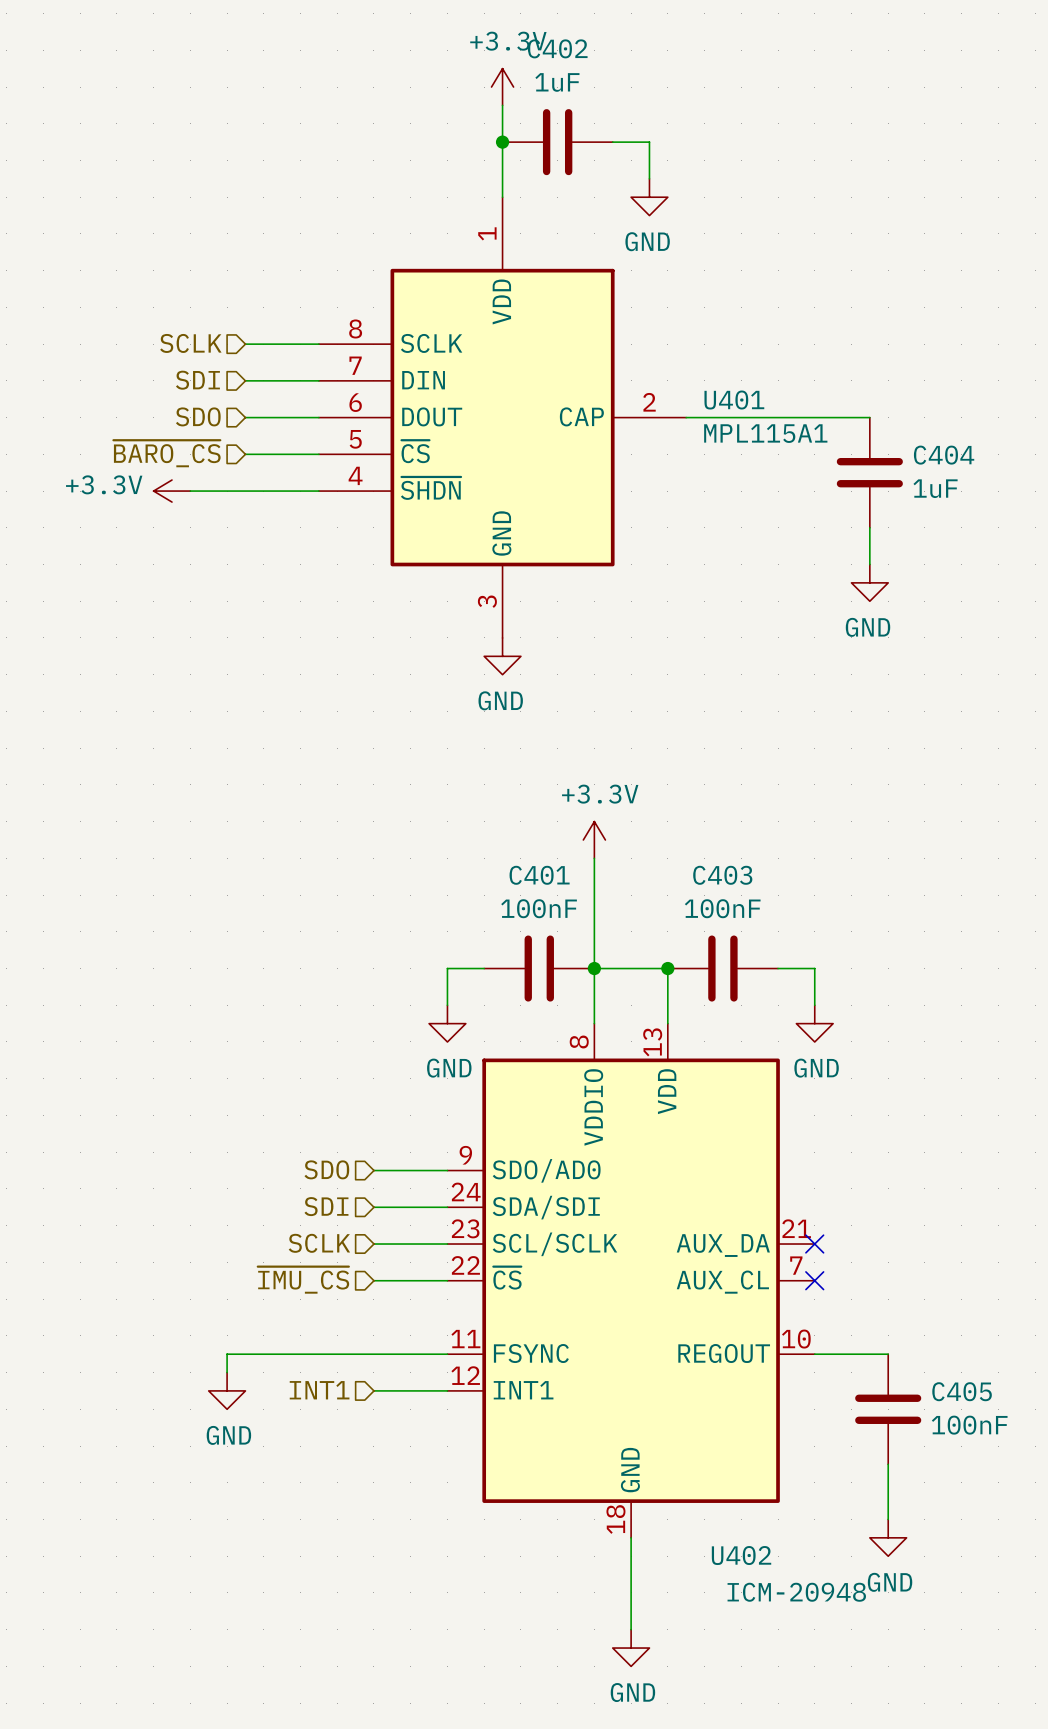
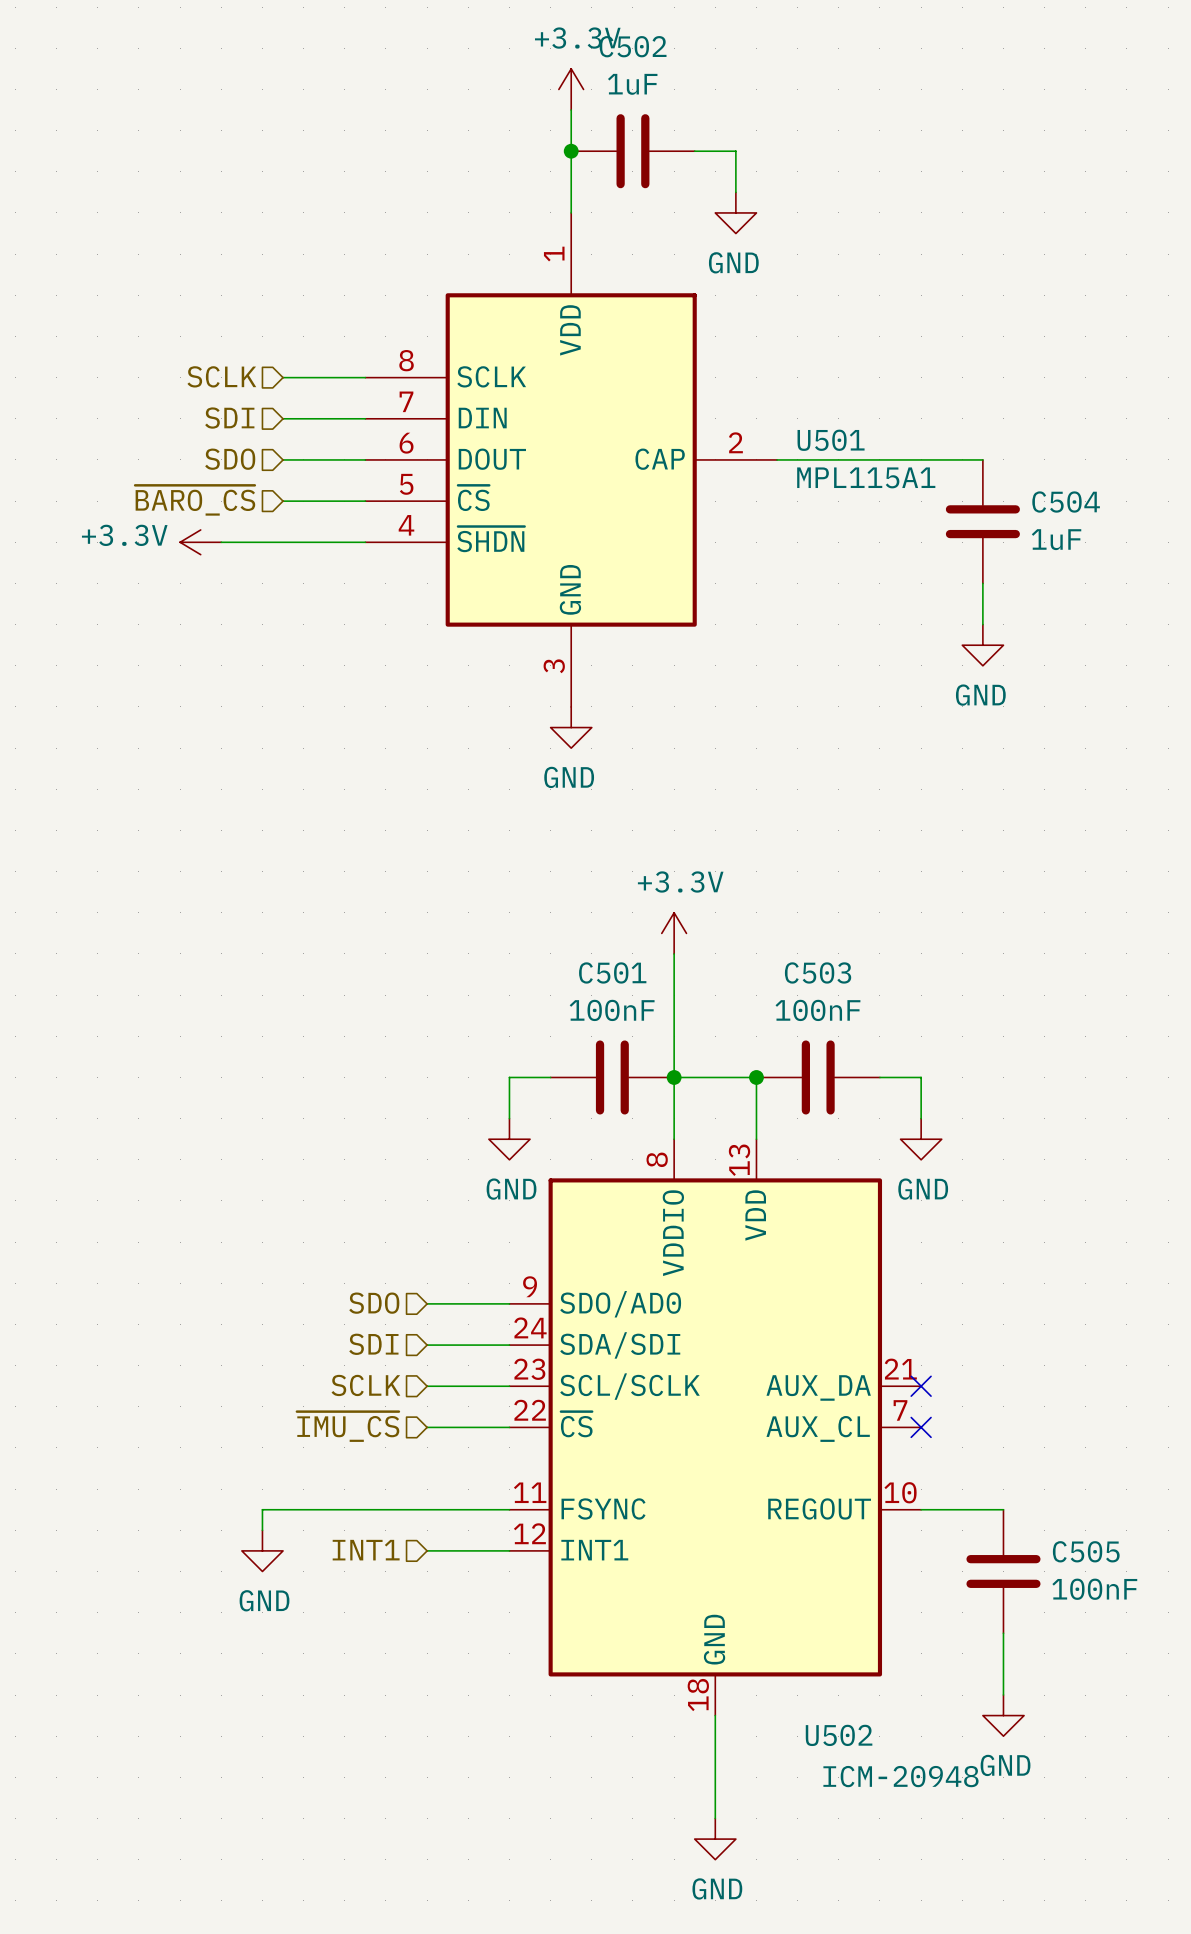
C402 name: C402 (557, 48) -> C502 (633, 46)
U401 name: U401 (734, 400) -> U501 (831, 440)
C404 name: C404 (944, 455) -> C504 (1066, 502)
C401 name: C401 (539, 875) -> C501 (612, 972)
C403 name: C403 (722, 875) -> C503 (818, 972)
C405 name: C405 (962, 1391) -> C505 (1086, 1551)
U402 name: U402 (741, 1555) -> U502 (839, 1735)

